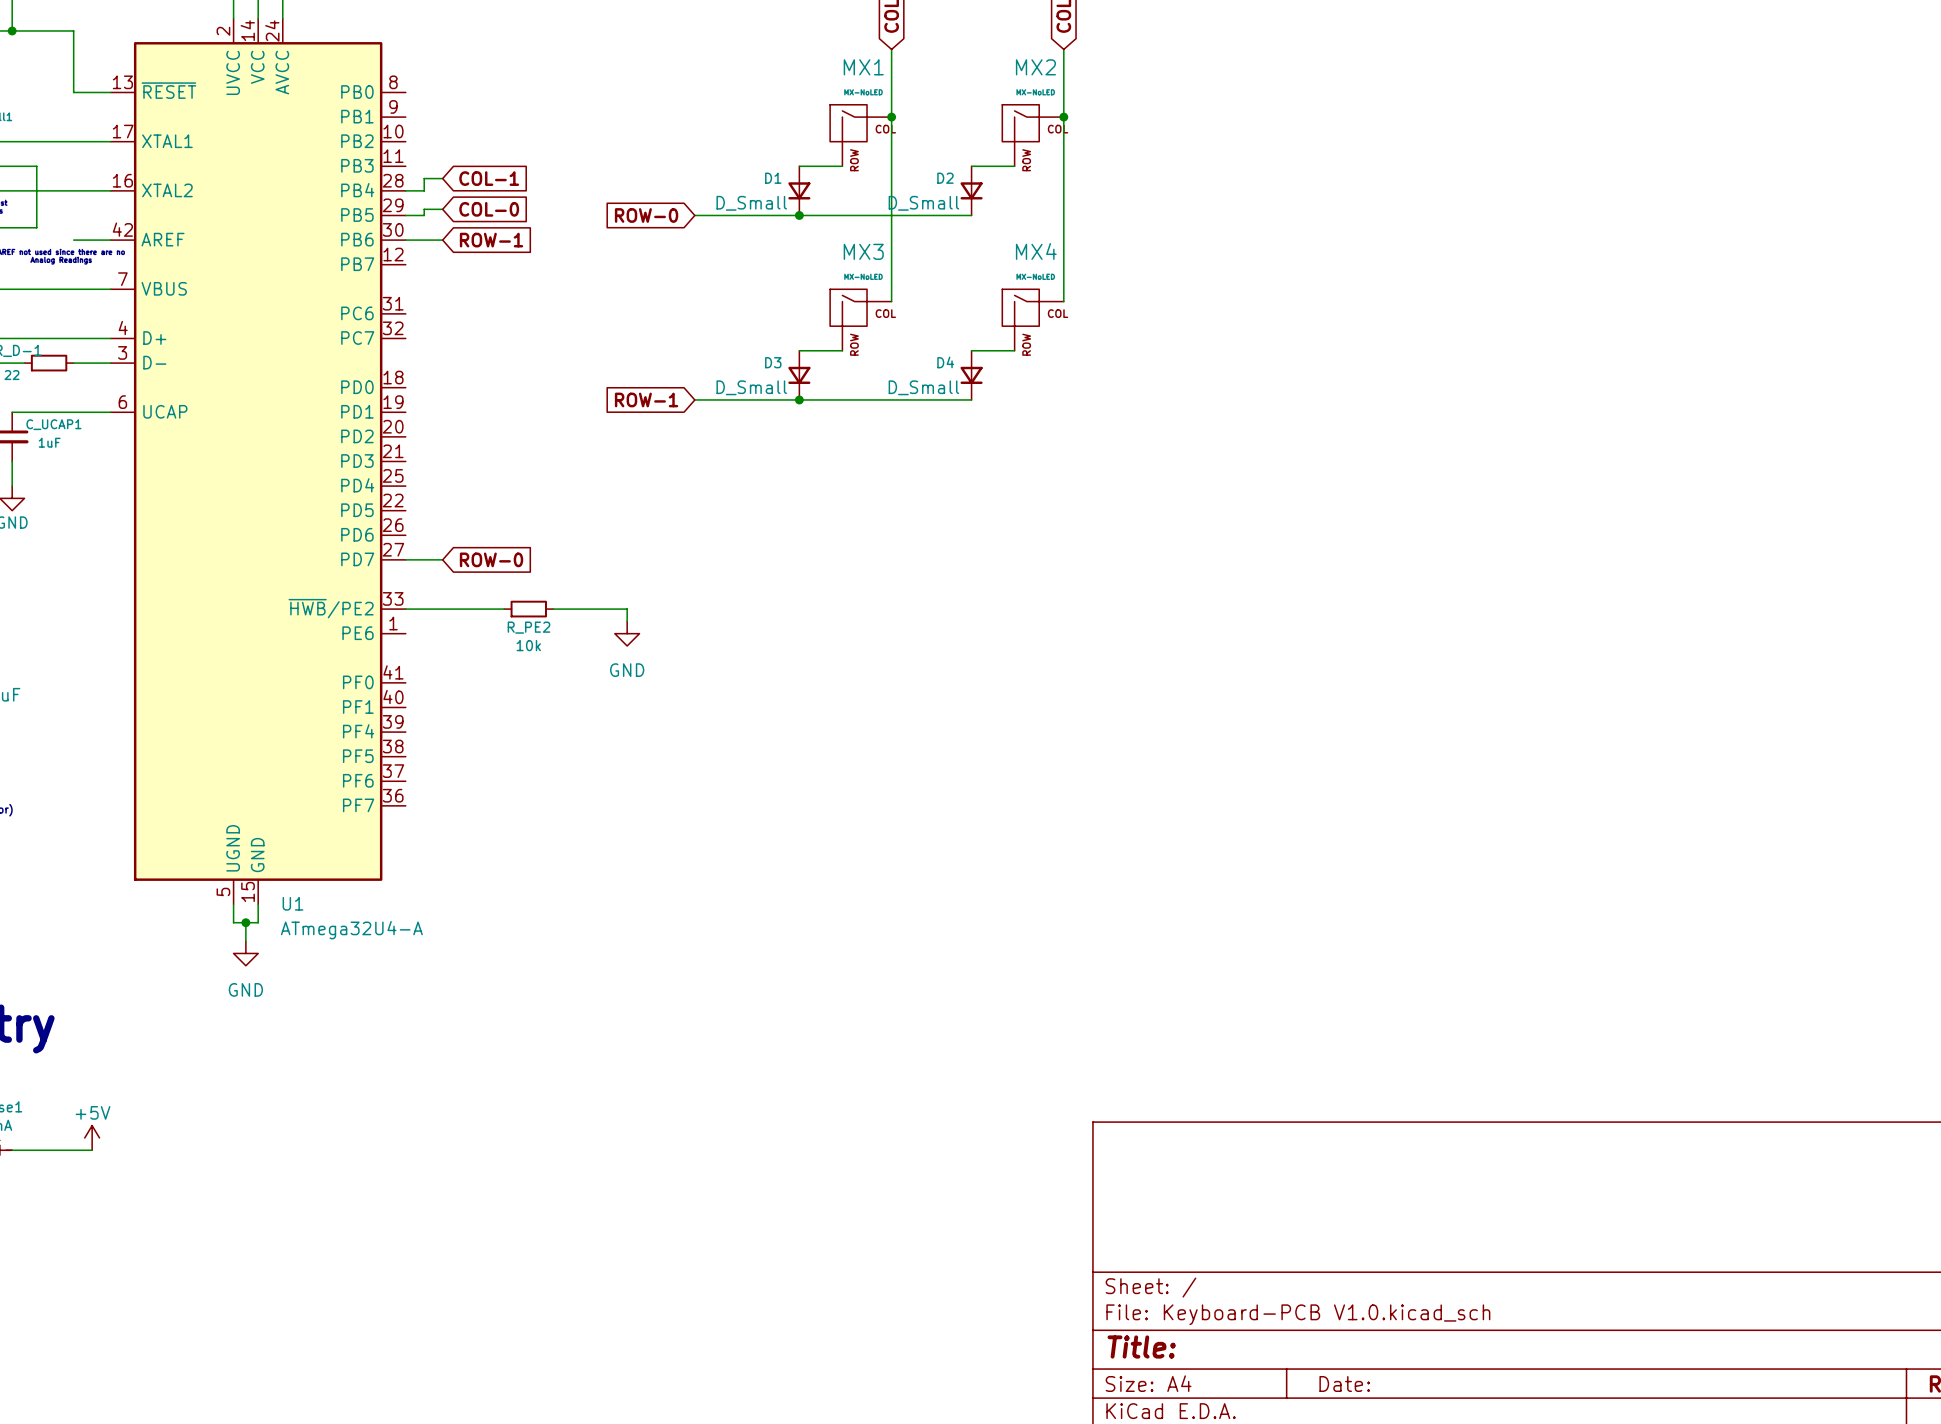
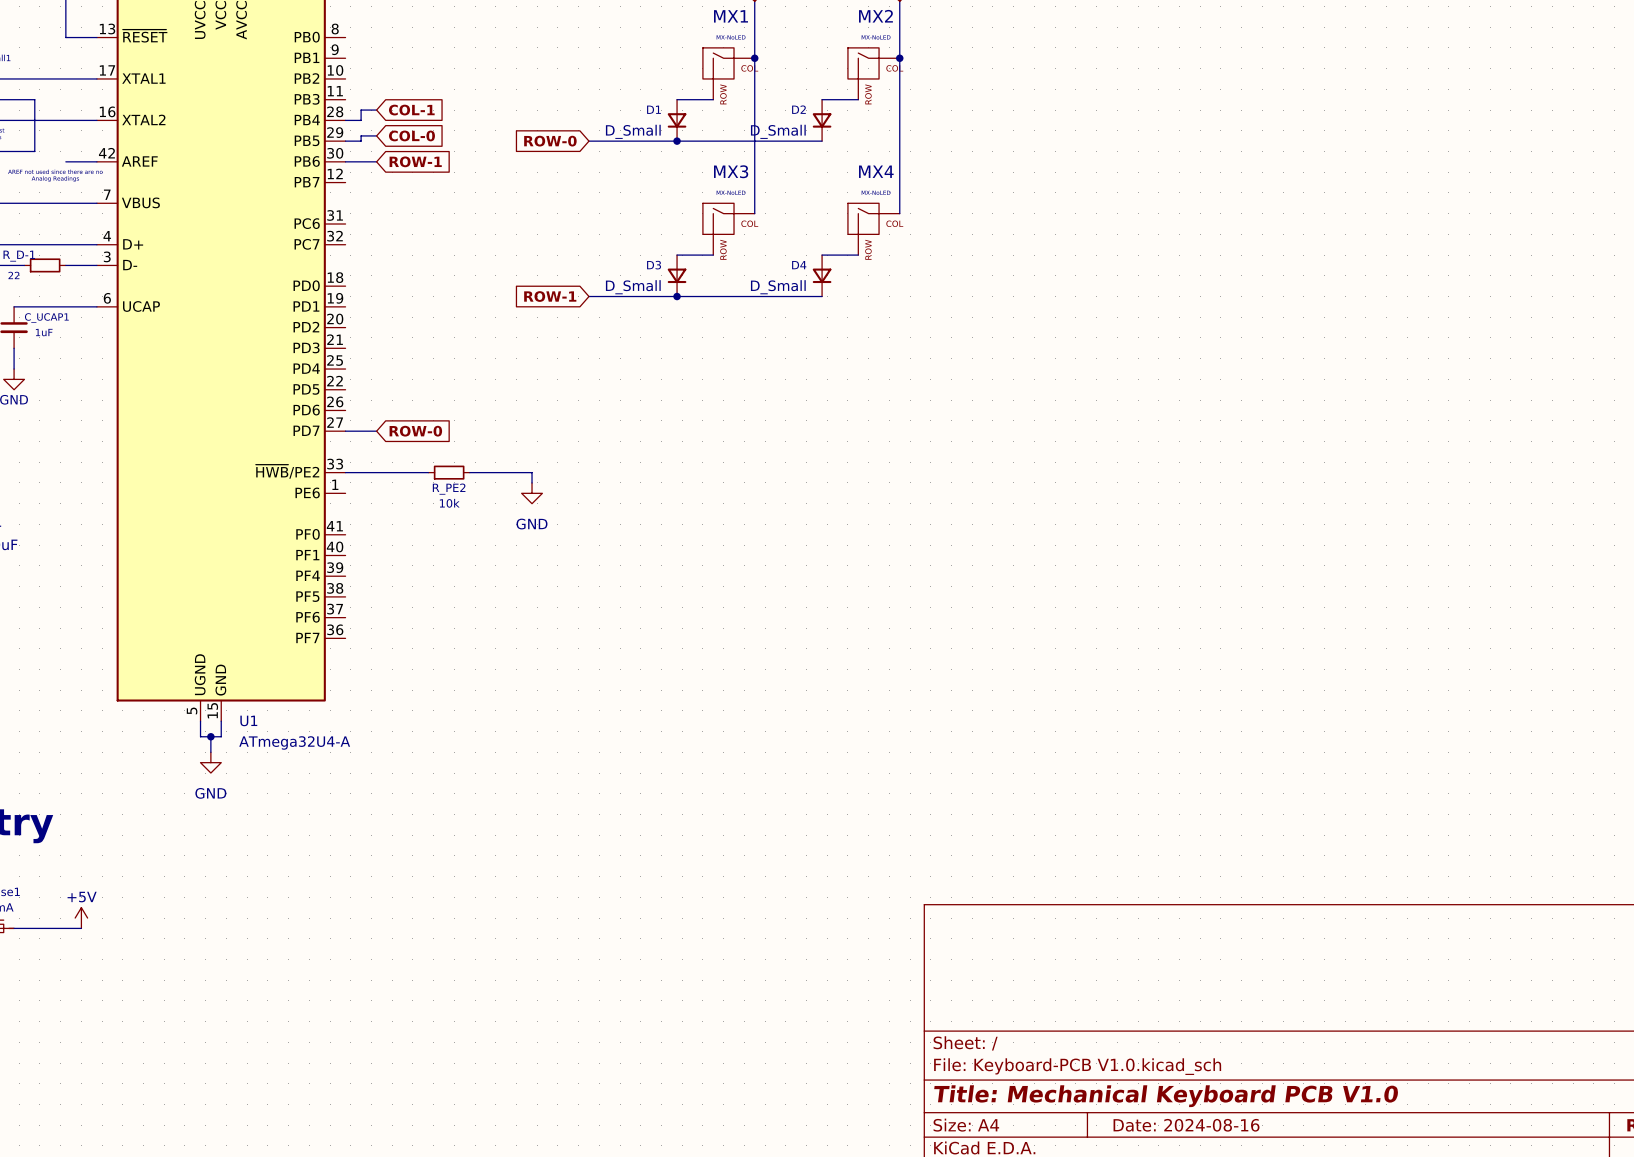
title block: Title: (1141, 1347) -> Title: Mechanical Keyboard PCB V1.0 (1166, 1096)
title block: Date: (1344, 1383) -> Date: 2024-08-16 (1186, 1125)

